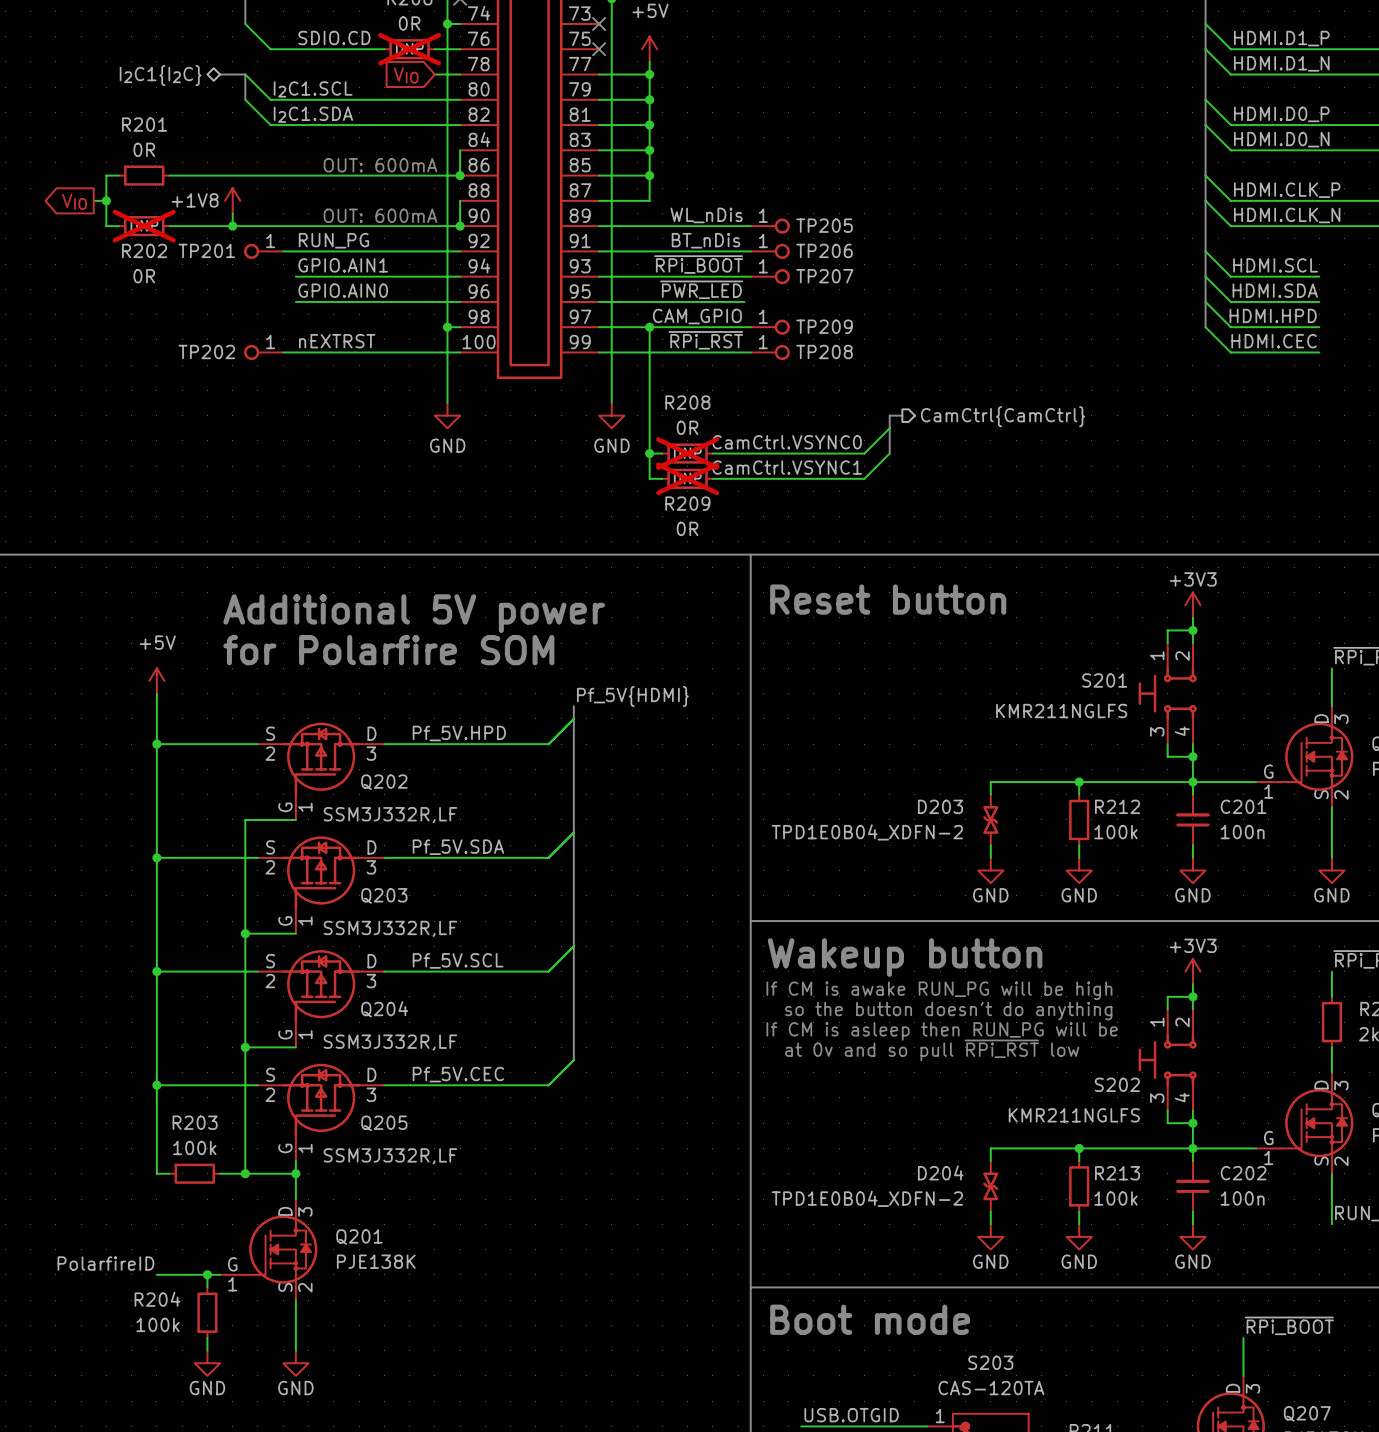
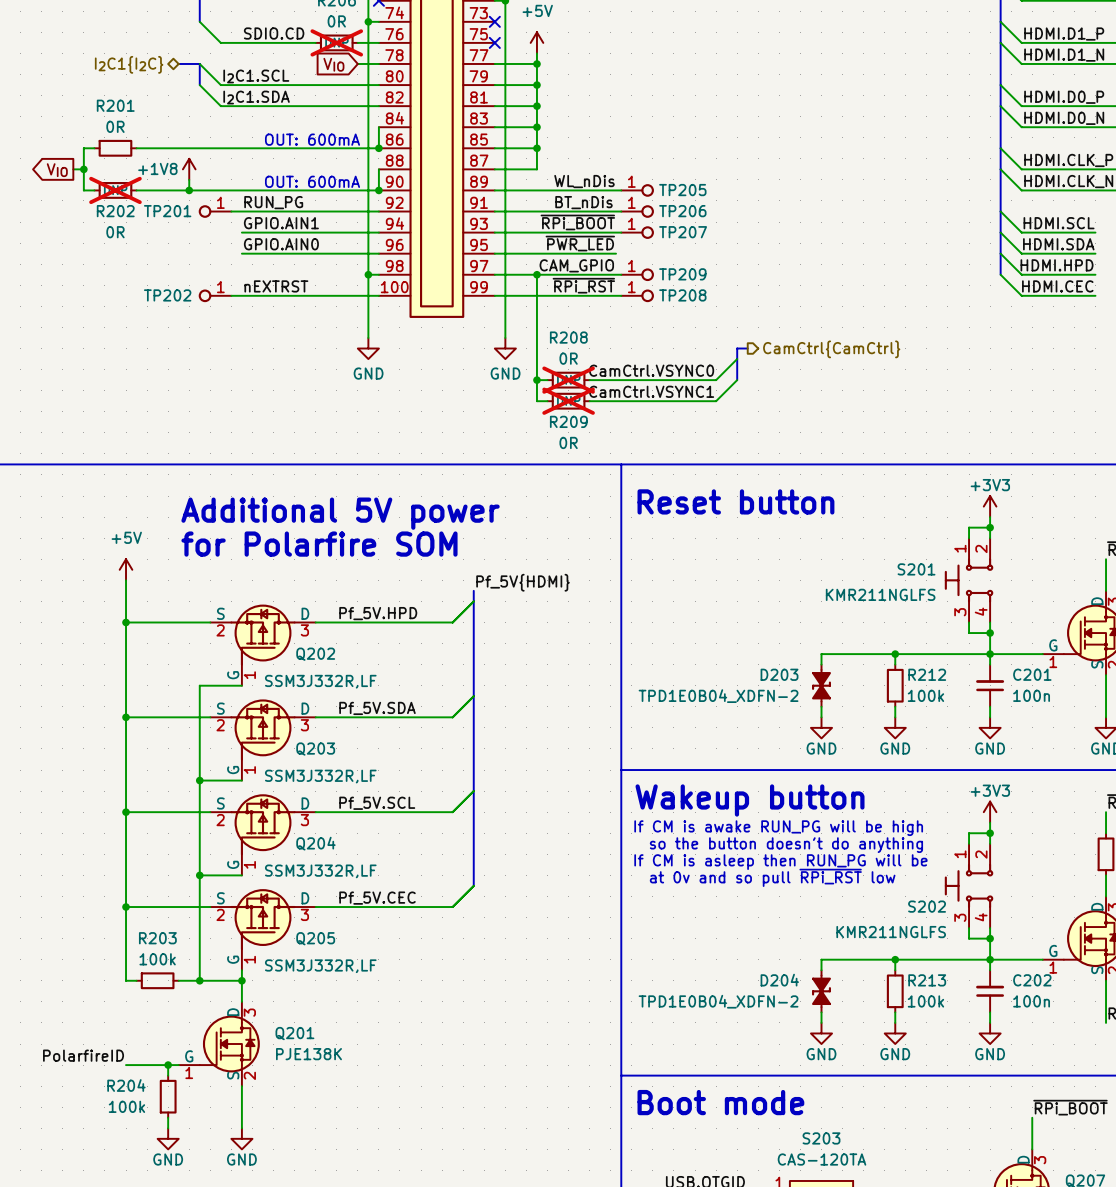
D203 symbol: [983, 794, 999, 846] -> [812, 664, 831, 707]
D204 symbol: [983, 1161, 999, 1212] -> [812, 970, 831, 1013]

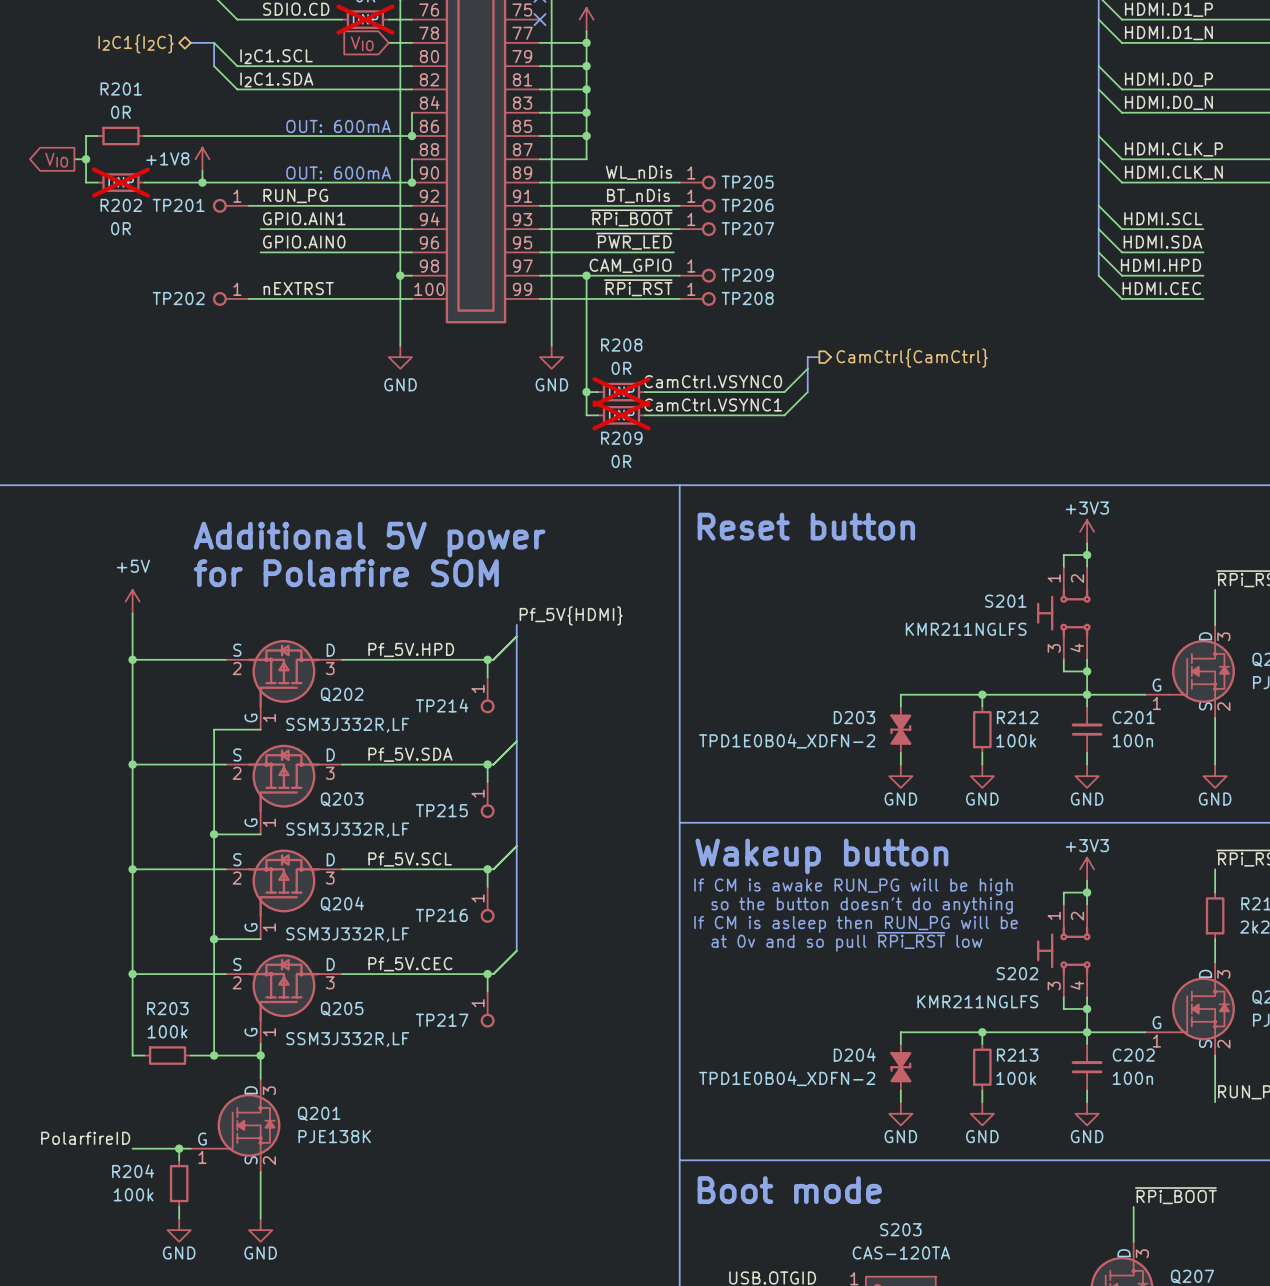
wire: none -> (487, 659) (487, 677)
junction: none -> (487, 659)
TP214: none -> (487, 695)
wire: none -> (487, 764) (487, 782)
junction: none -> (487, 764)
TP215: none -> (487, 800)
wire: none -> (487, 869) (487, 886)
junction: none -> (487, 869)
TP216: none -> (487, 904)
wire: none -> (487, 974) (487, 991)
junction: none -> (487, 974)
TP217: none -> (487, 1009)

